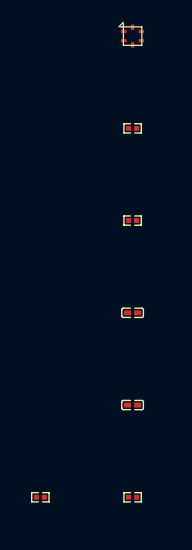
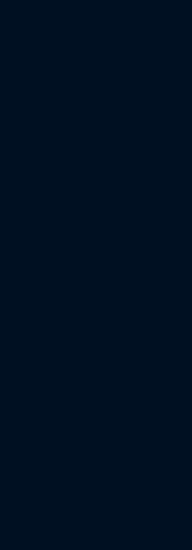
part: (131, 34) -> none
part: (132, 128) -> none
part: (132, 220) -> none
part: (132, 312) -> none
part: (132, 405) -> none
part: (40, 497) -> none
part: (132, 497) -> none

